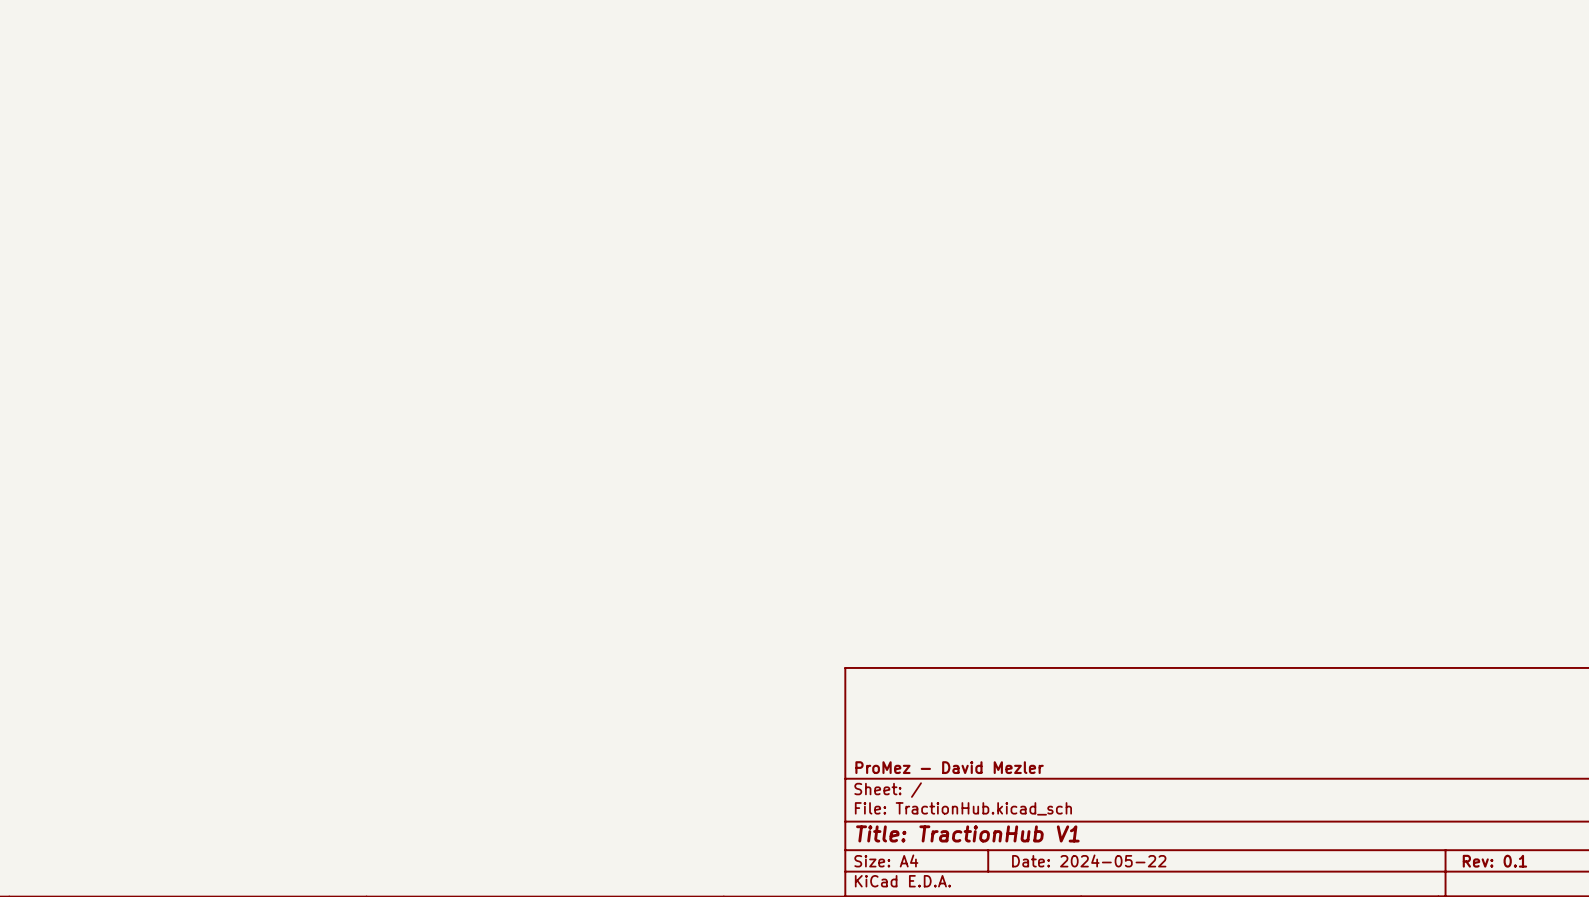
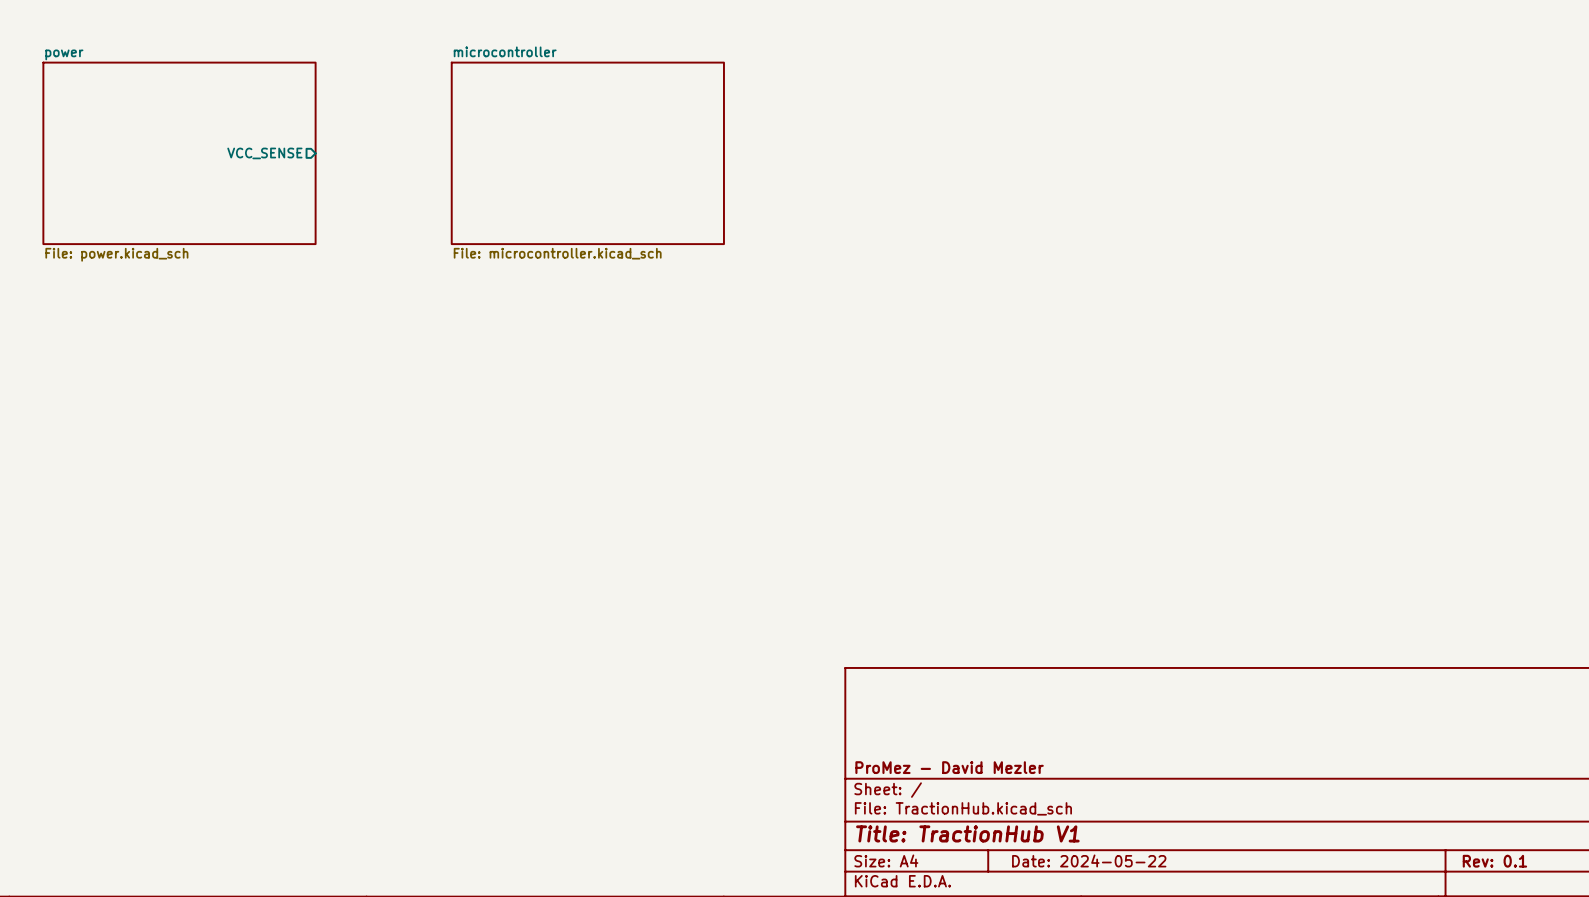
sheet power: none -> File: power.kicad_sch (179, 153)
sheet pin: none -> VCC_SENSE (264, 153)
sheet microcontroller: none -> File: microcontroller.kicad_sch (587, 153)

